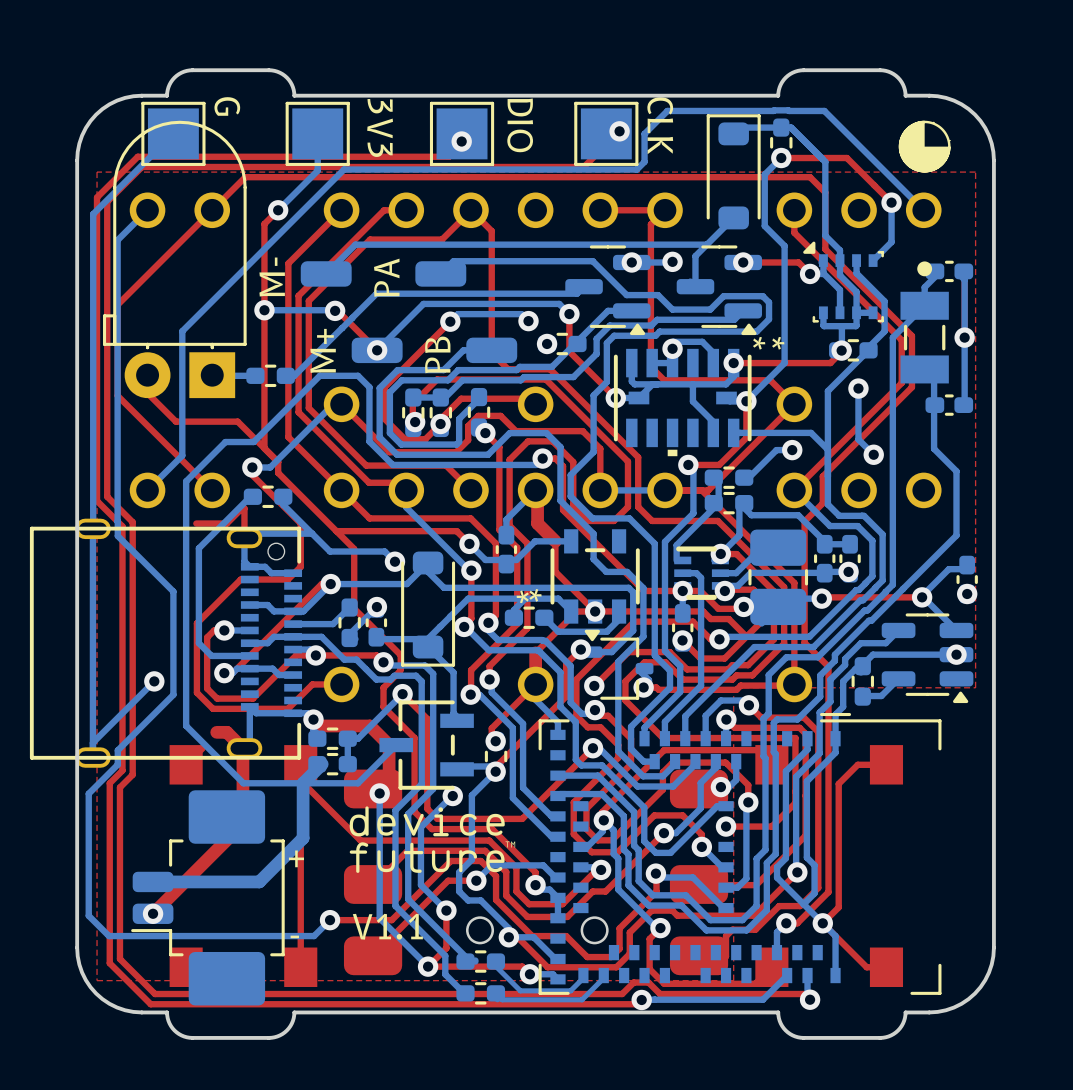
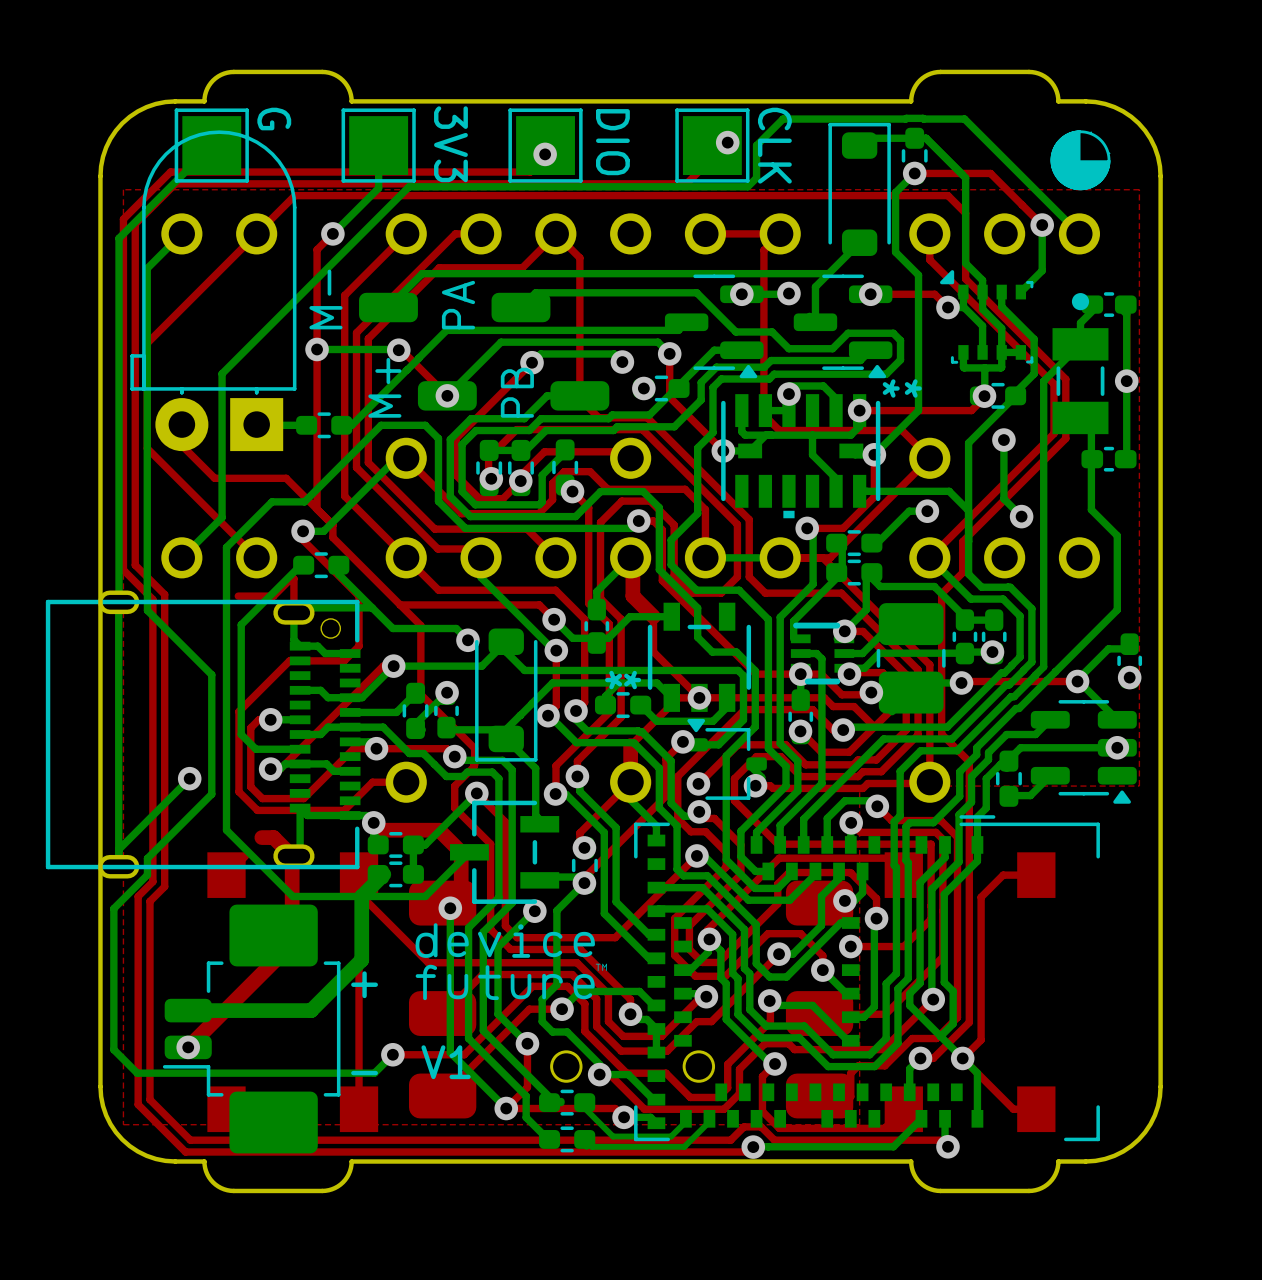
text: V1.1 (387, 926) -> V1 (446, 1062)

